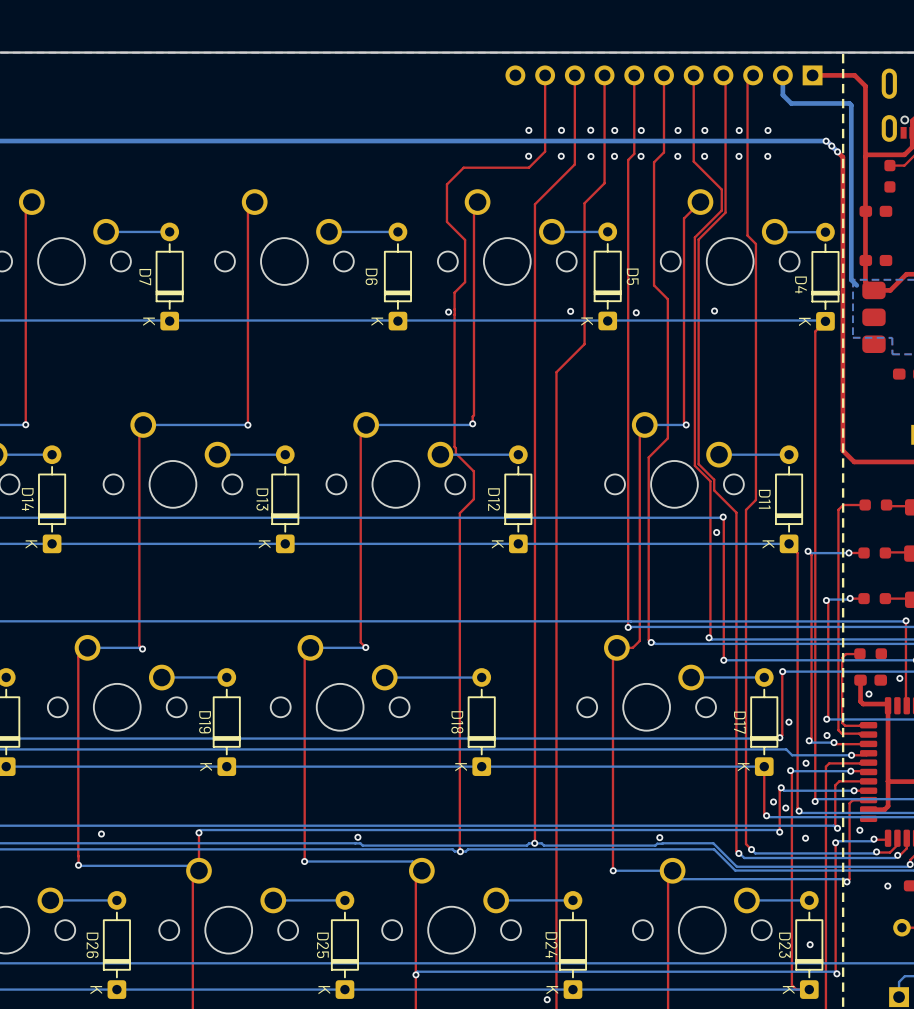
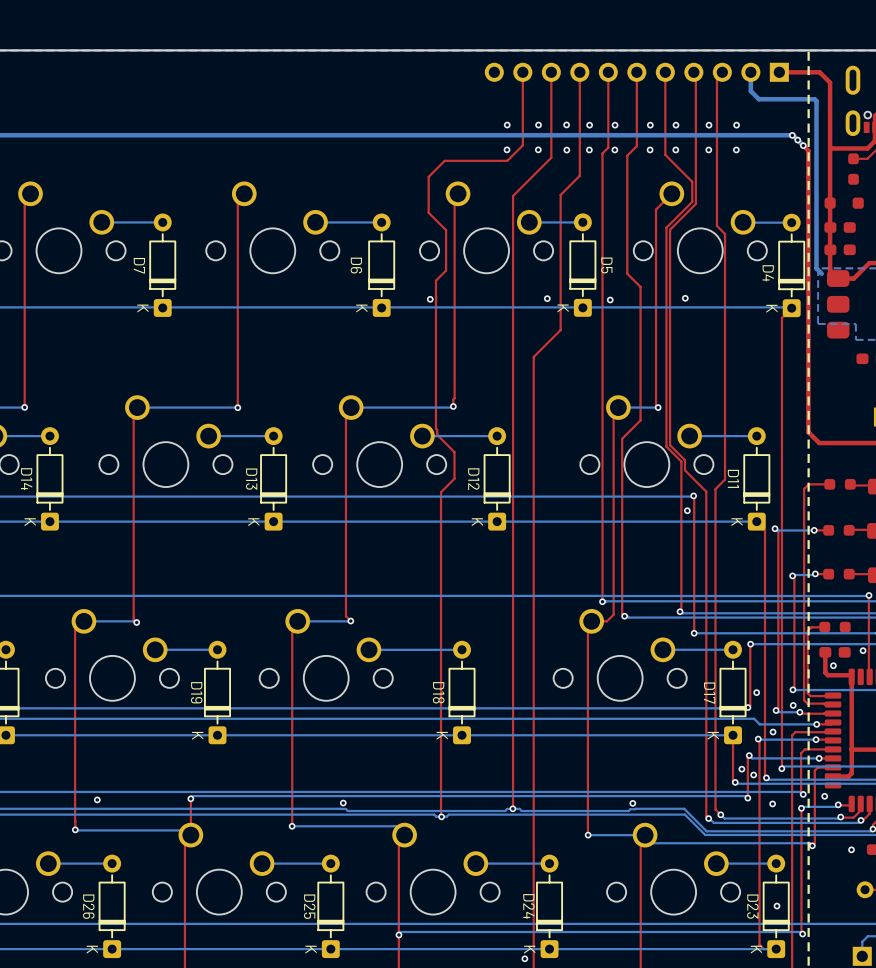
part footprint: [859, 205, 893, 217] -> [824, 197, 864, 209]
part: none -> (840, 227)

